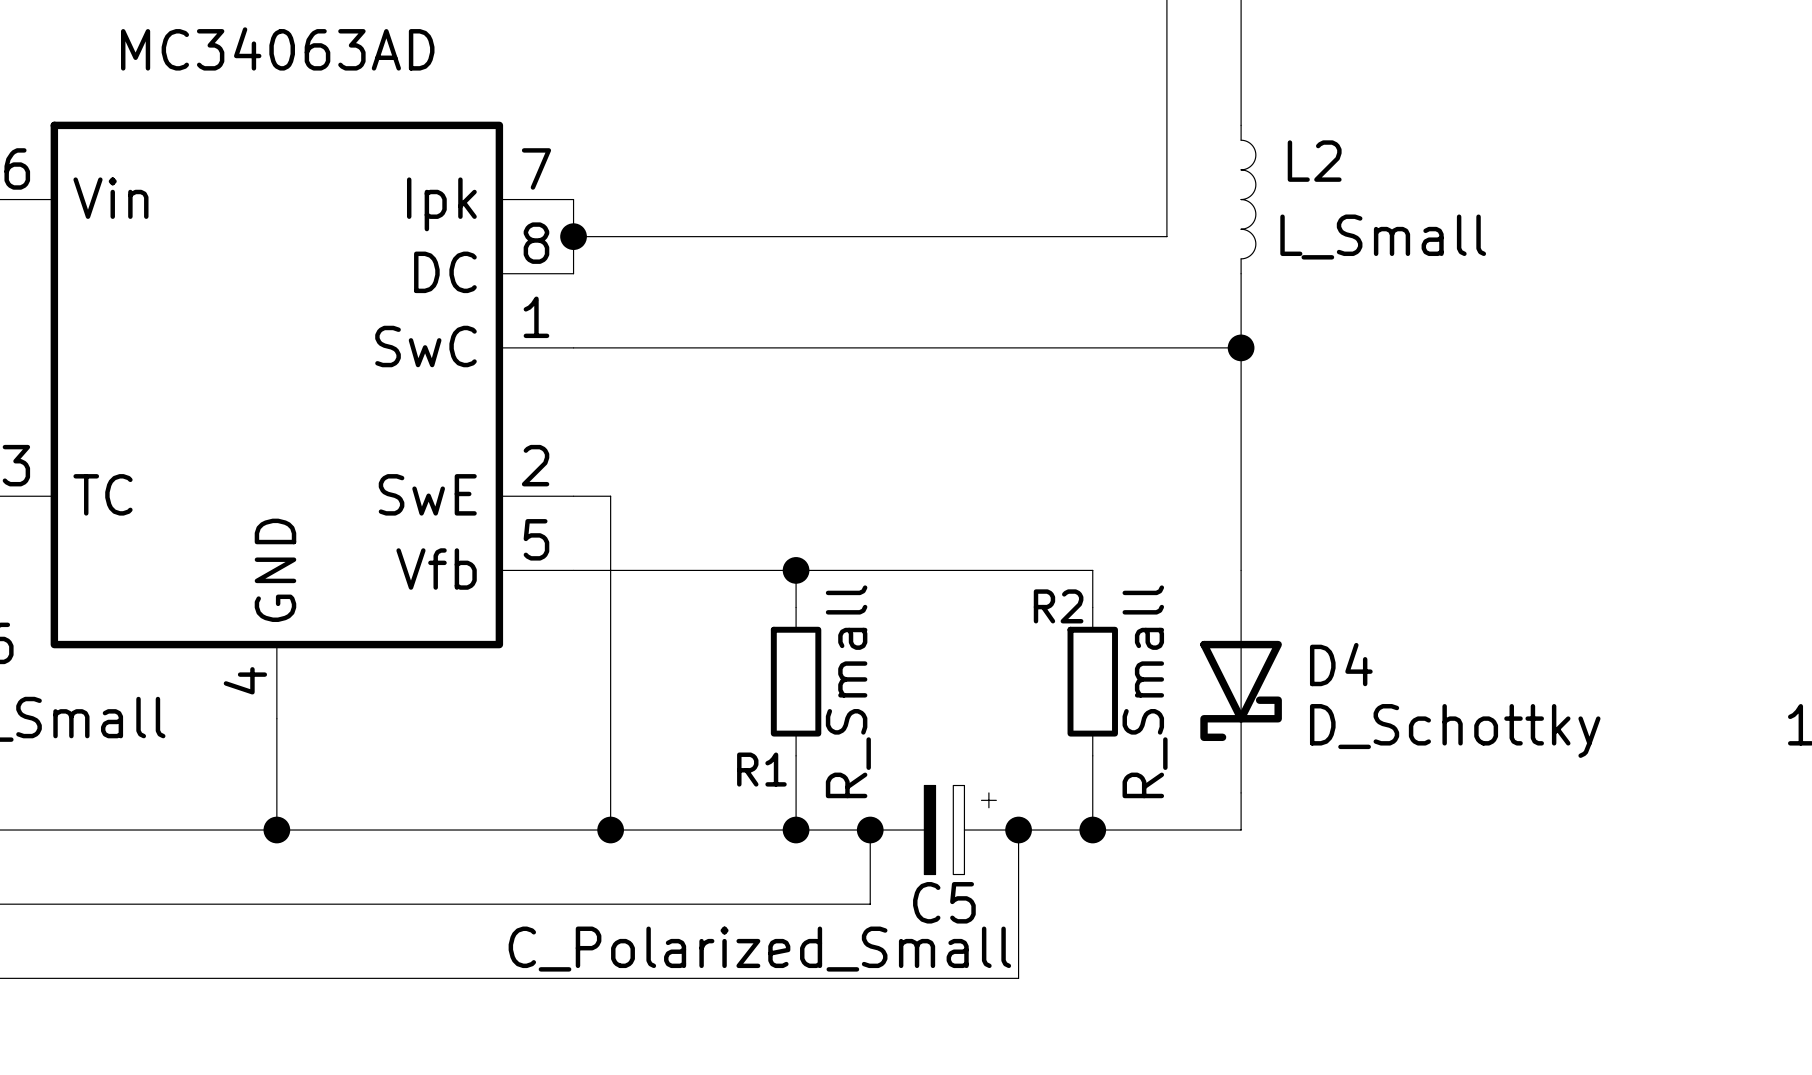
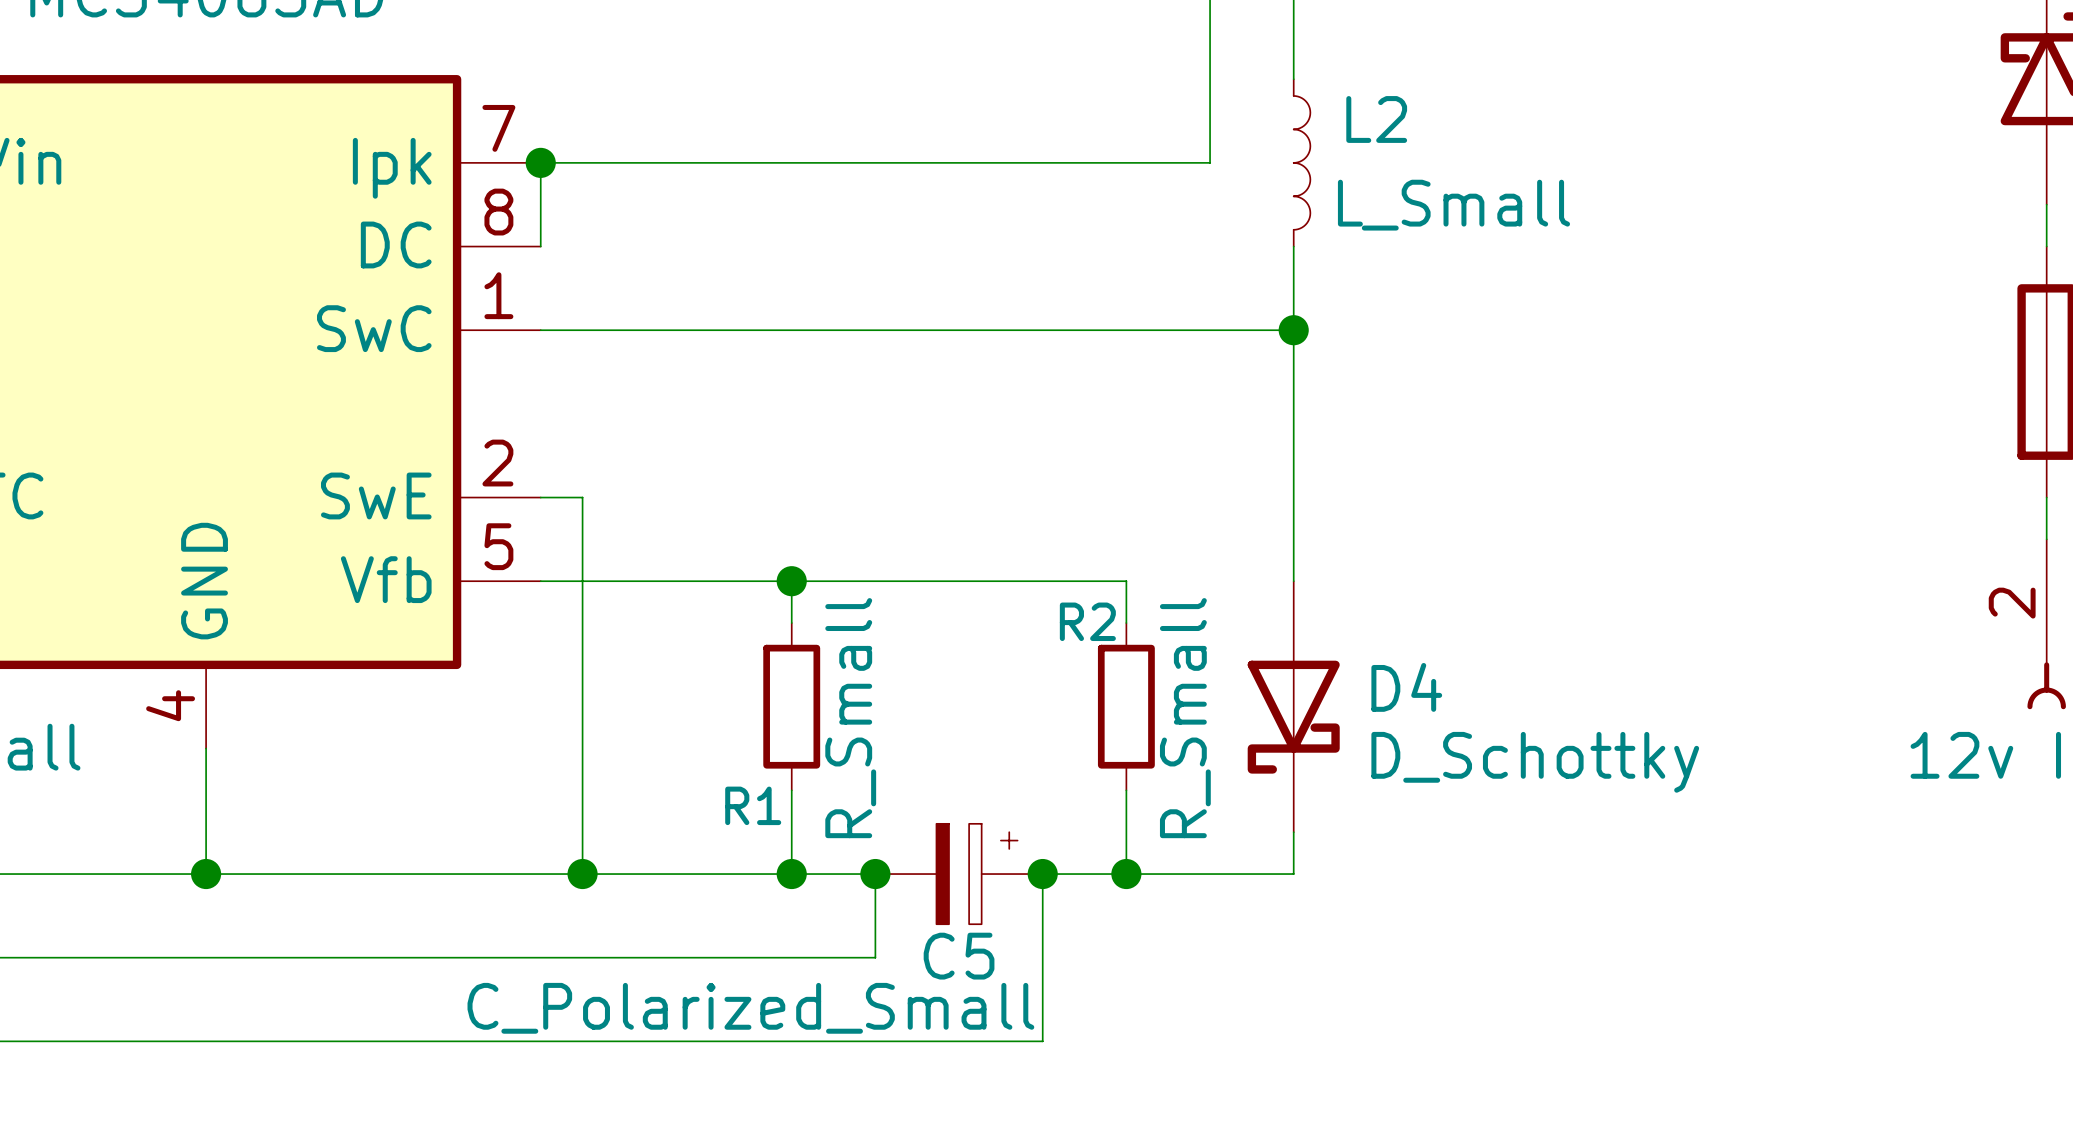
wire: (1166, 199) (1166, 236) (573, 236) -> (1210, 162) (540, 162)
junction position: (573, 236) -> (540, 162)

